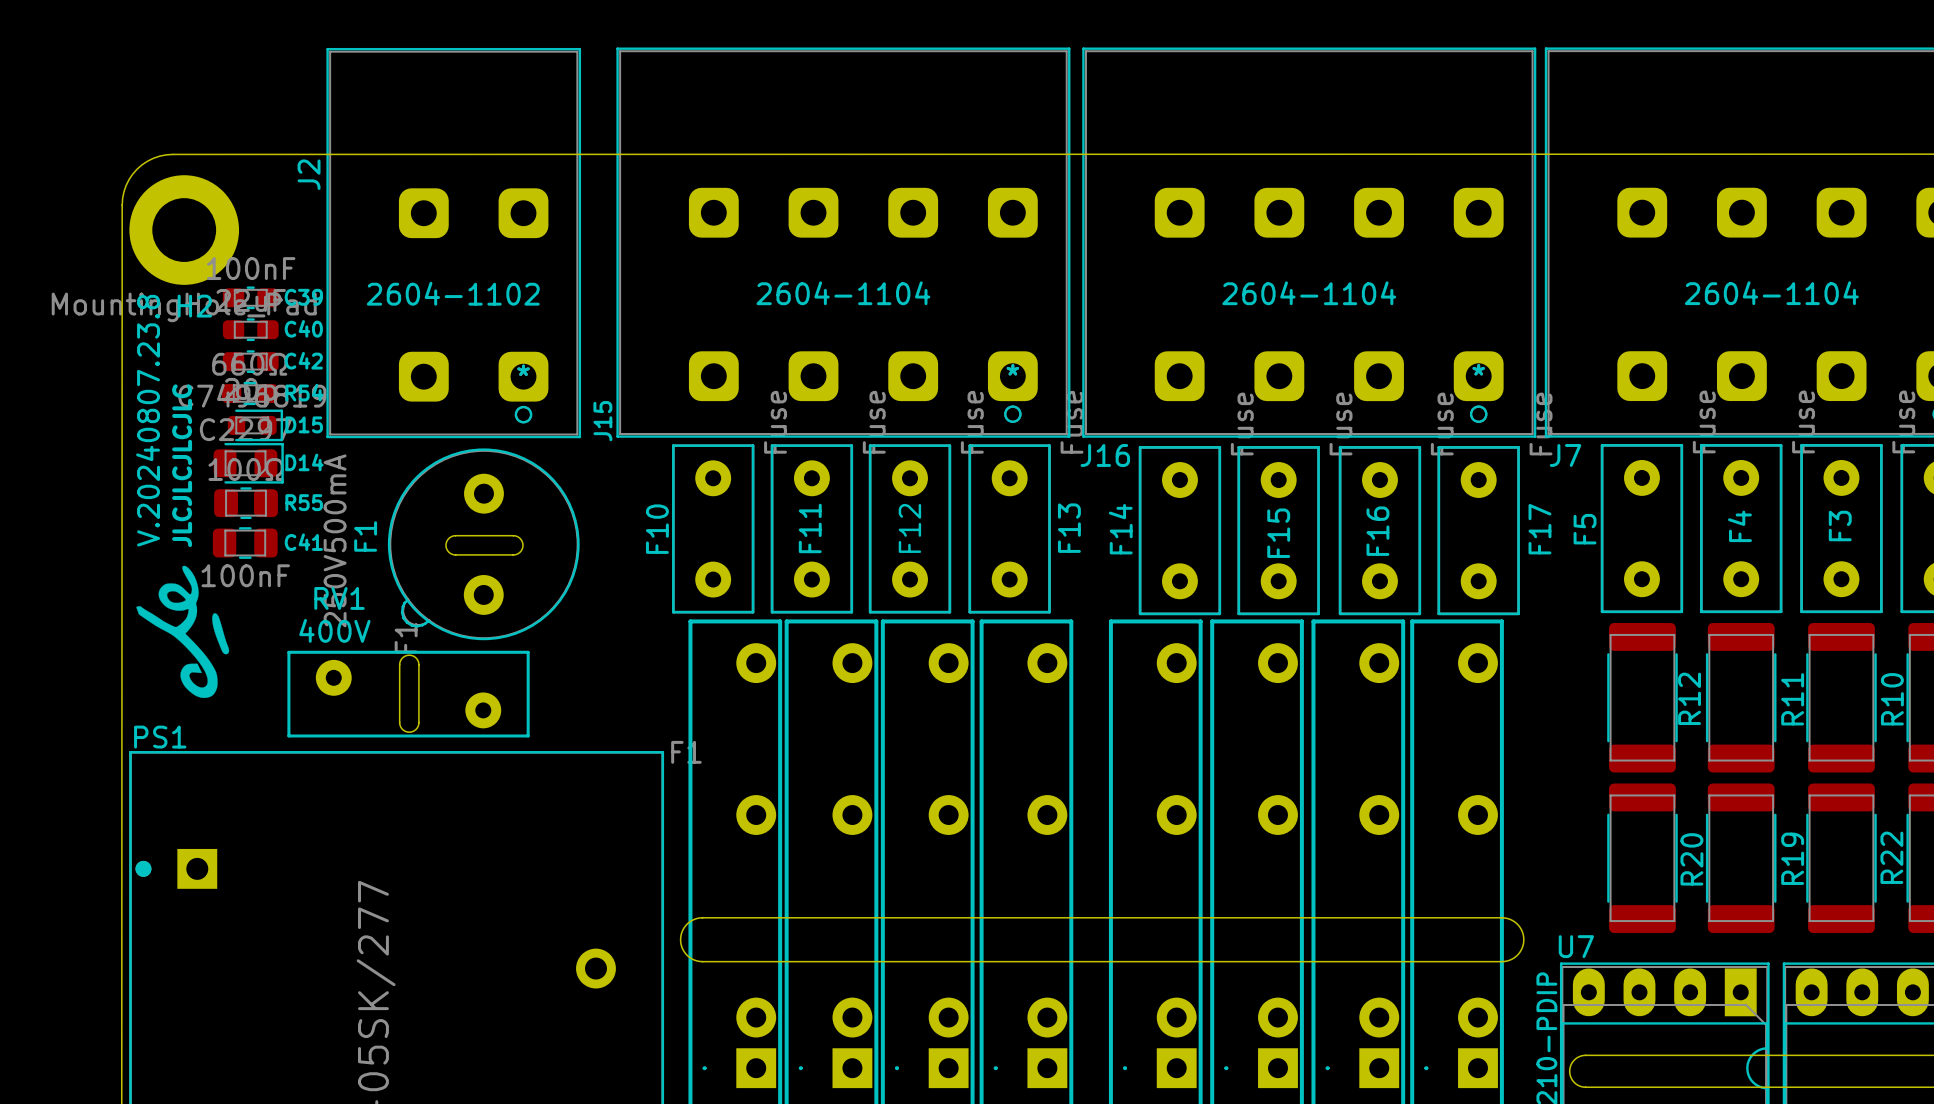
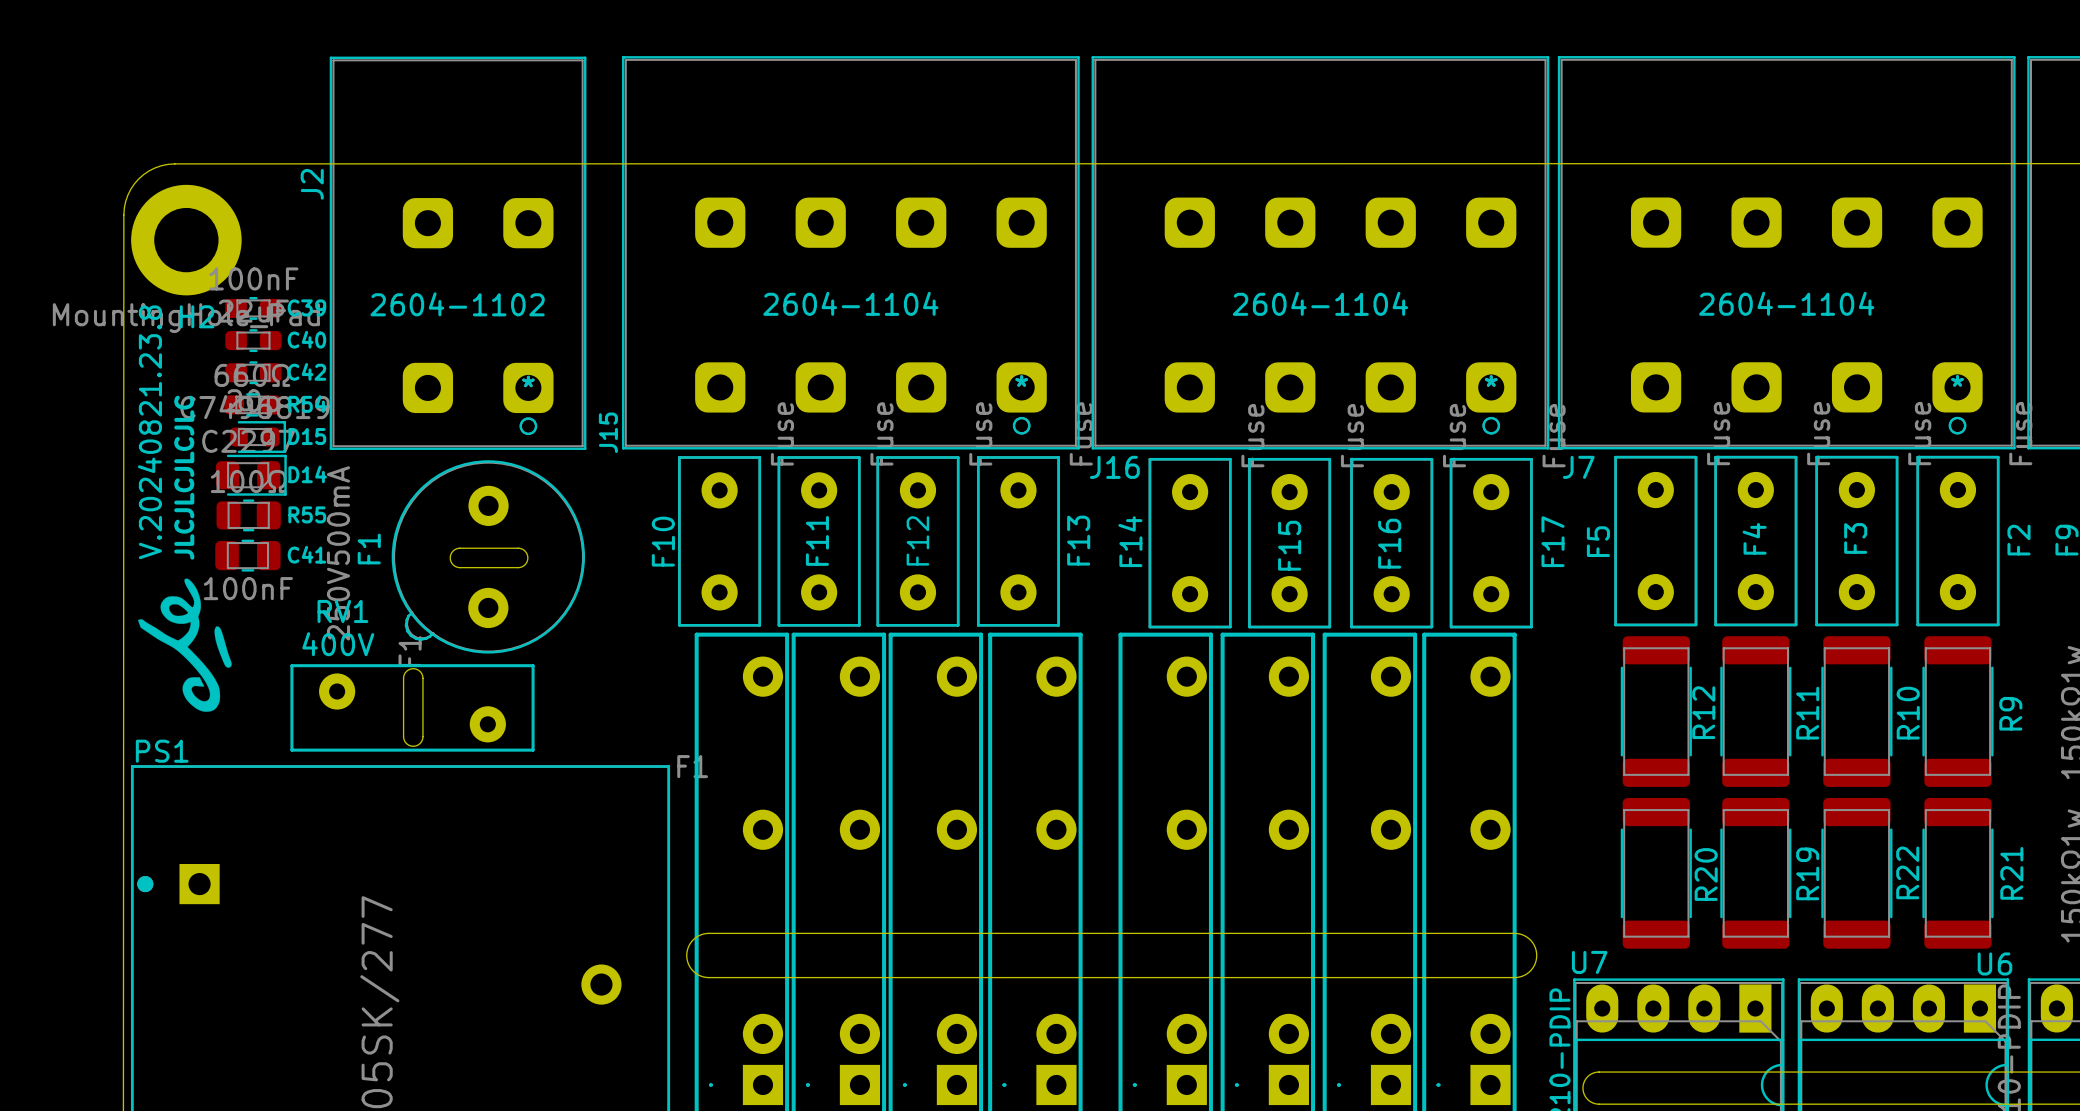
text: V.20240807.23.8 (148, 420) -> V.20240821.23.8 (149, 432)

